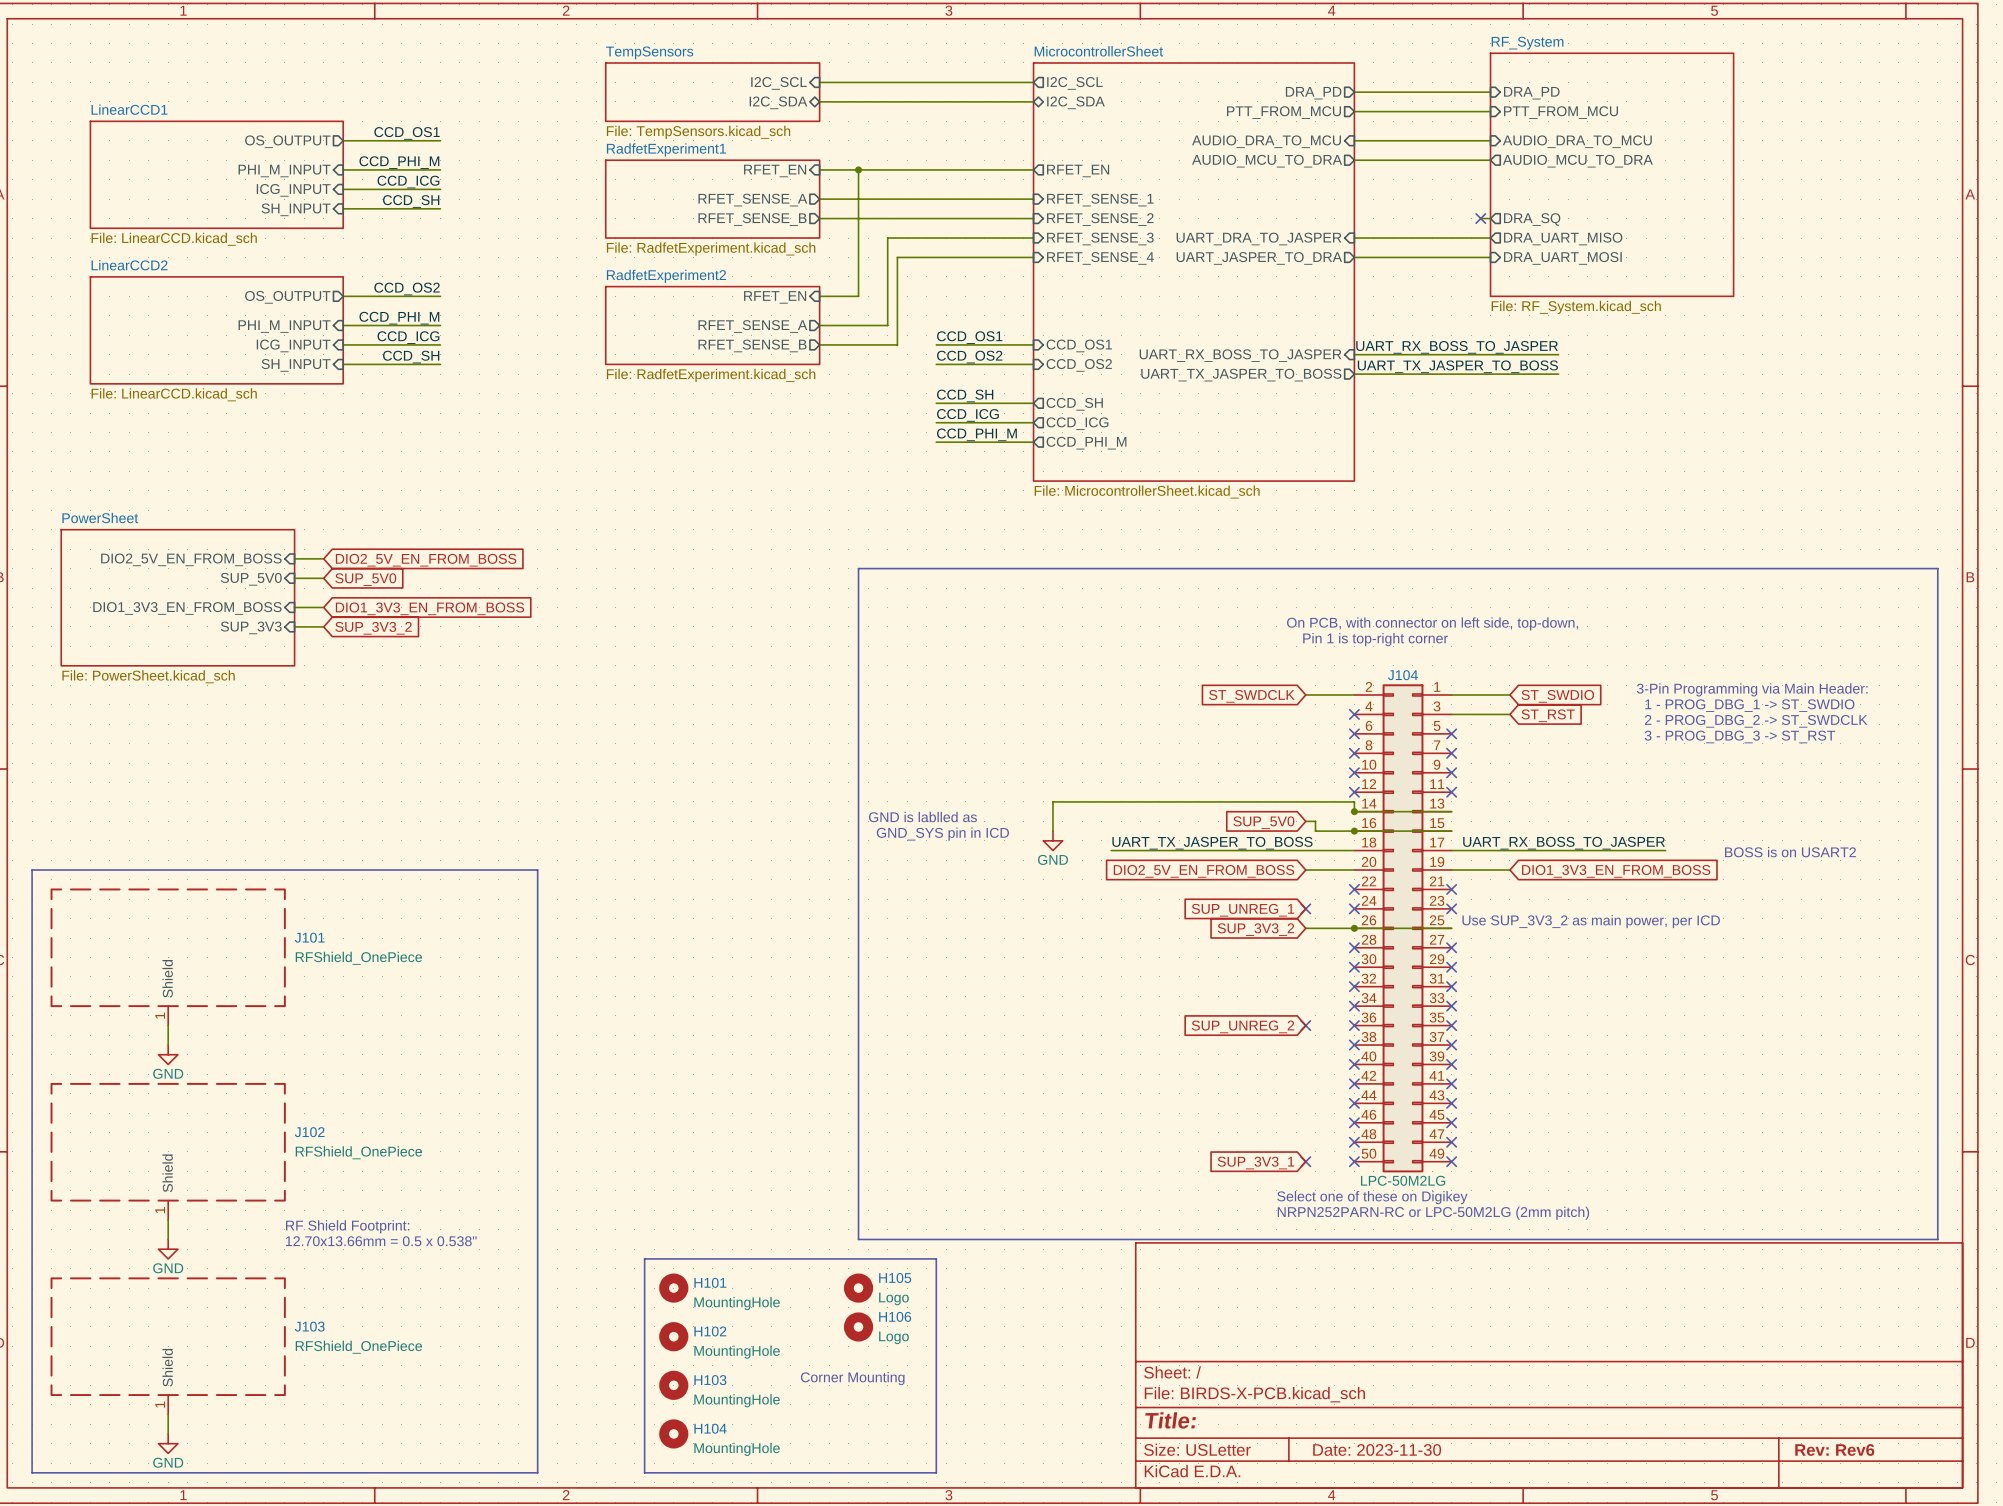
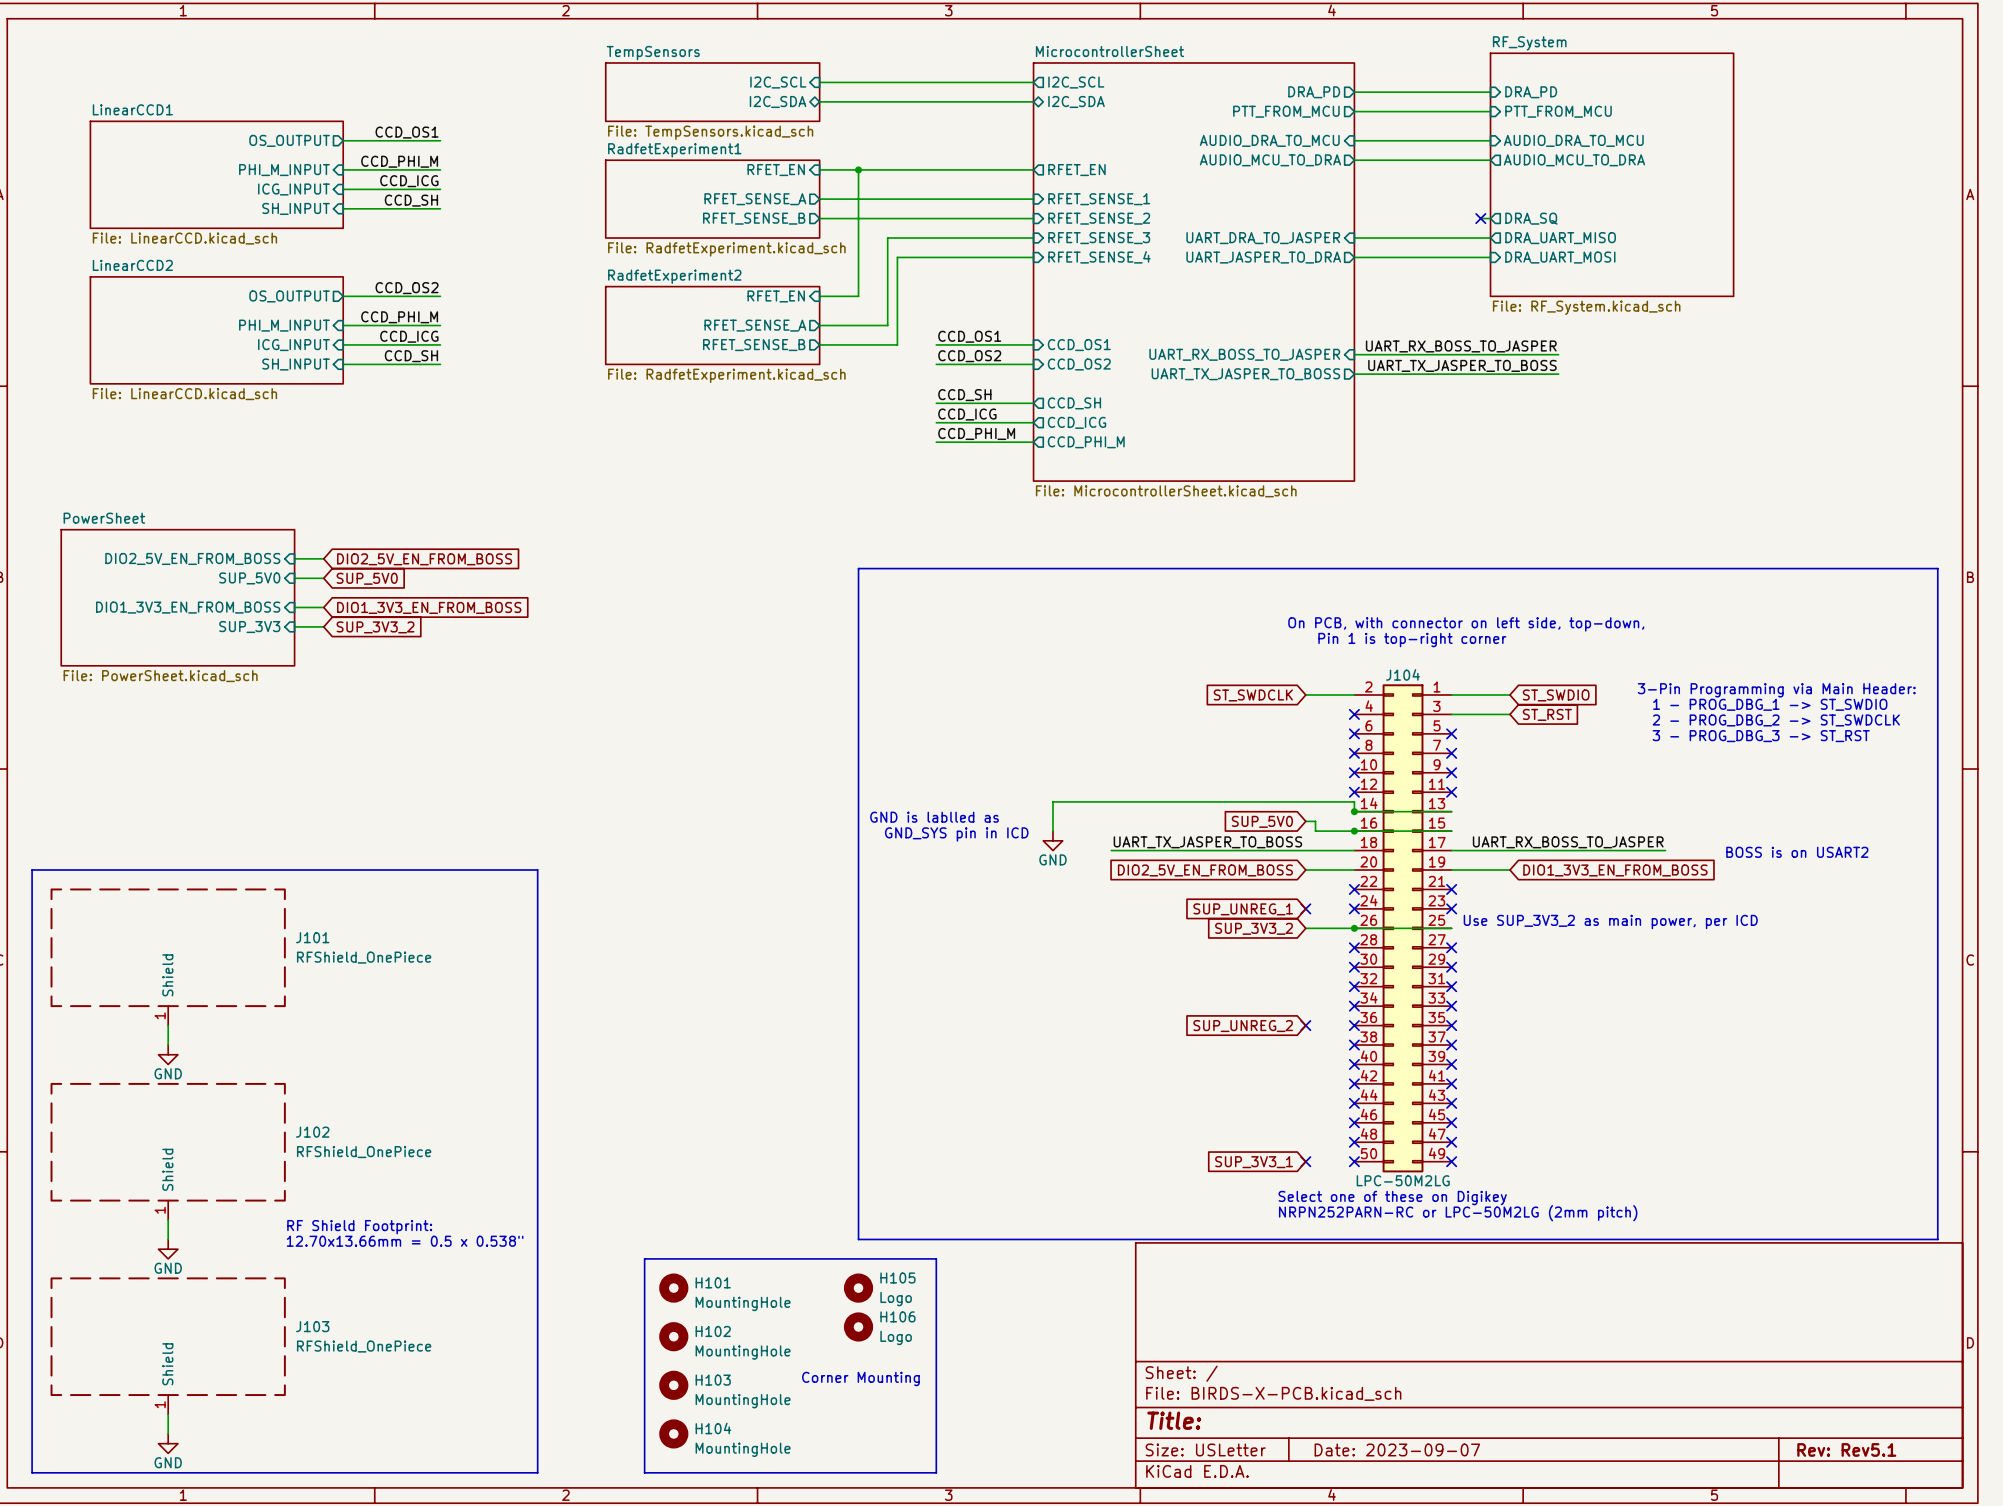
title block: Date: 2023-11-30 (1377, 1449) -> Date: 2023-09-07 (1397, 1449)
title block: Rev: Rev6 (1834, 1449) -> Rev: Rev5.1 (1846, 1449)

